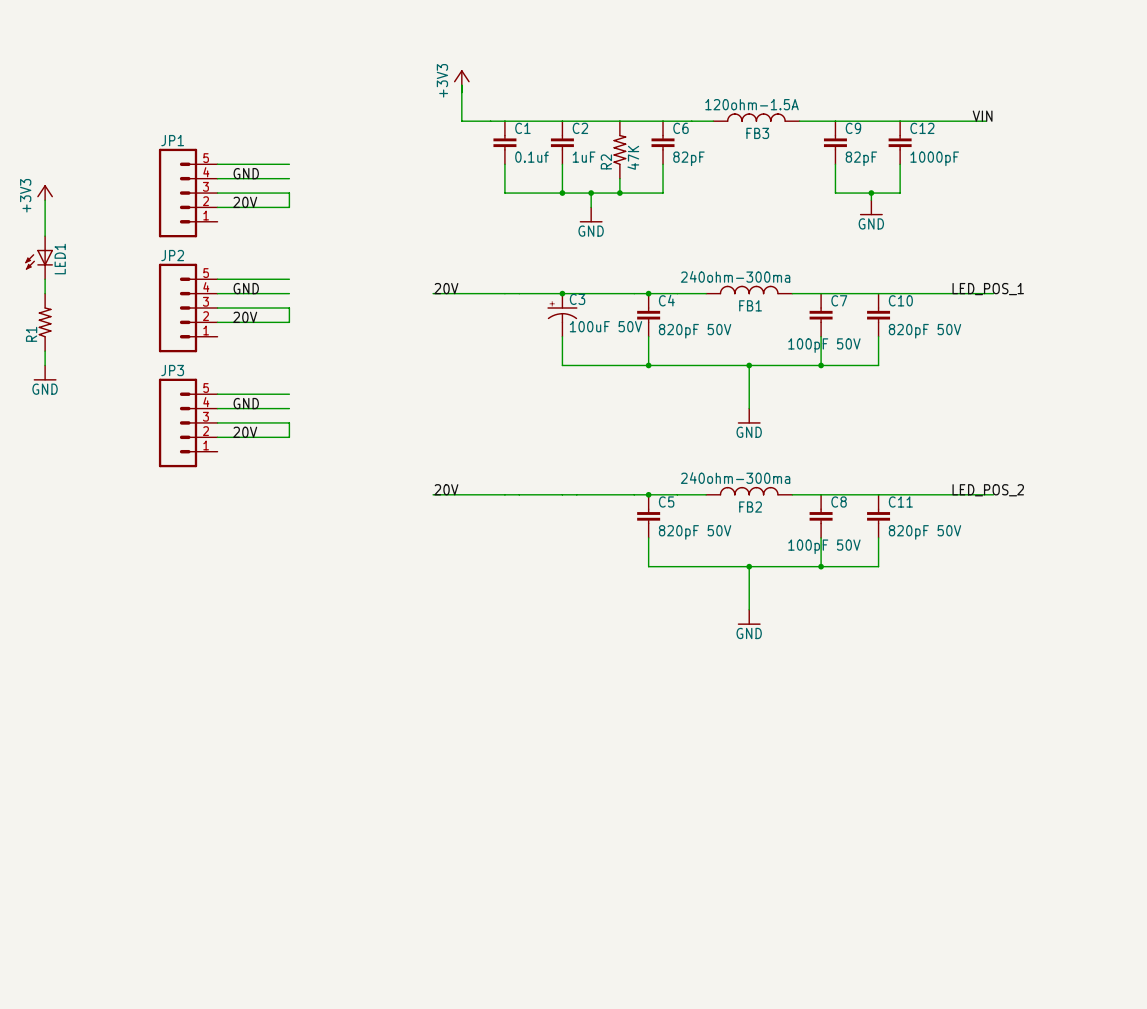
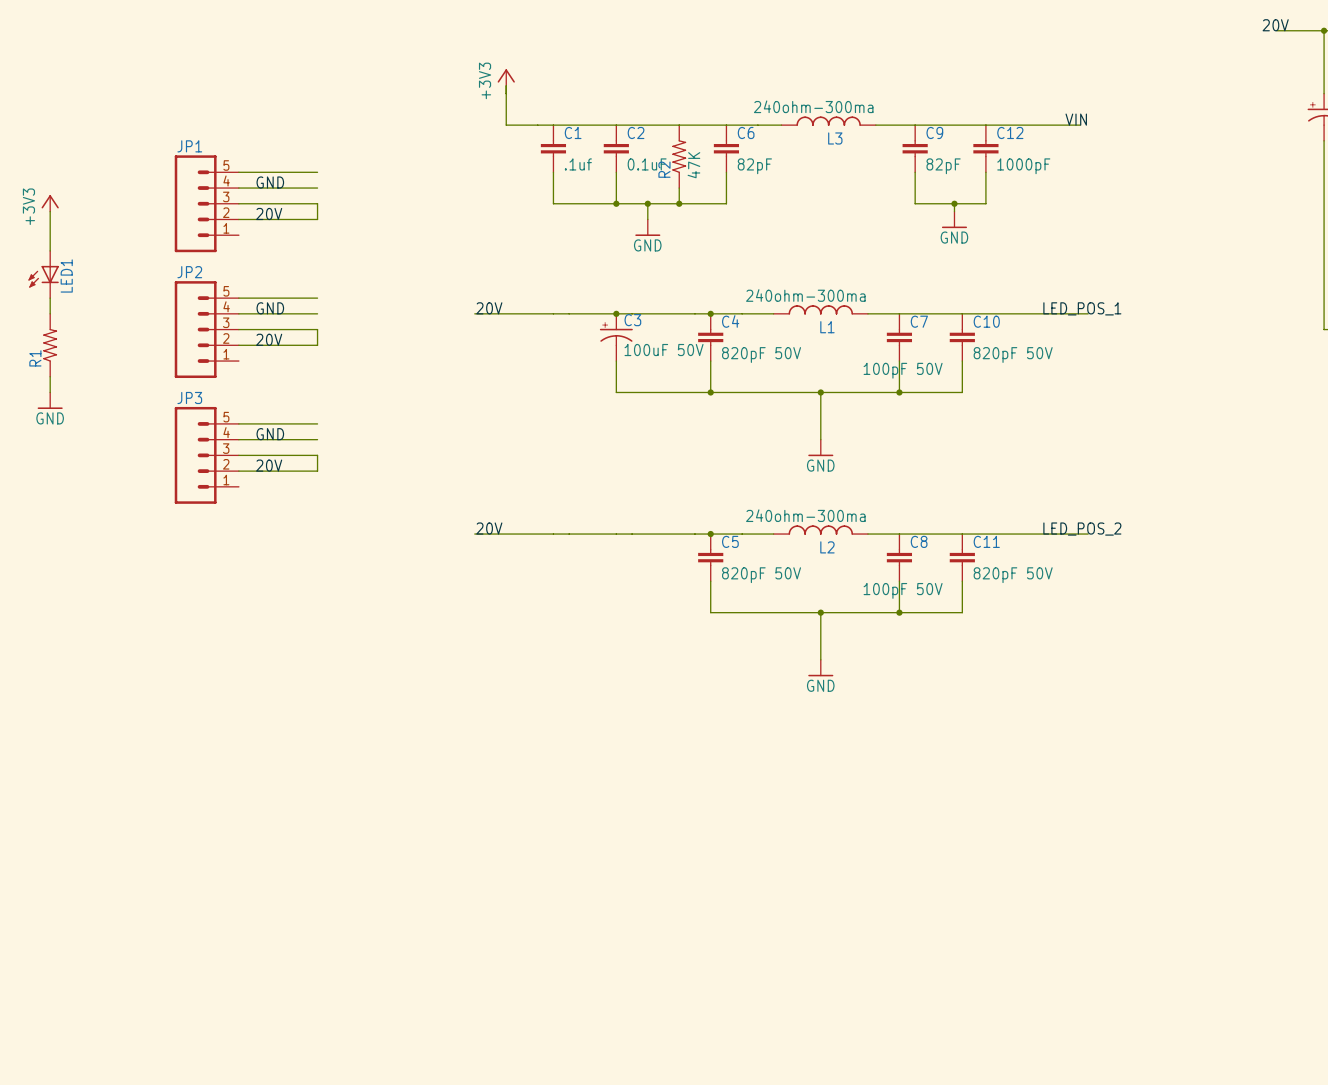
FB3 value: 120ohm-1.5A (752, 104) -> 240ohm-300ma (813, 106)
FB3 name: FB3 (757, 133) -> L3 (835, 138)
C1 value: 0.1uf (531, 157) -> .1uf (578, 164)
C2 value: 1uF (584, 157) -> 0.1uF (647, 164)
FB1 name: FB1 (750, 305) -> L1 (827, 327)
FB2 name: FB2 (750, 507) -> L2 (827, 547)

